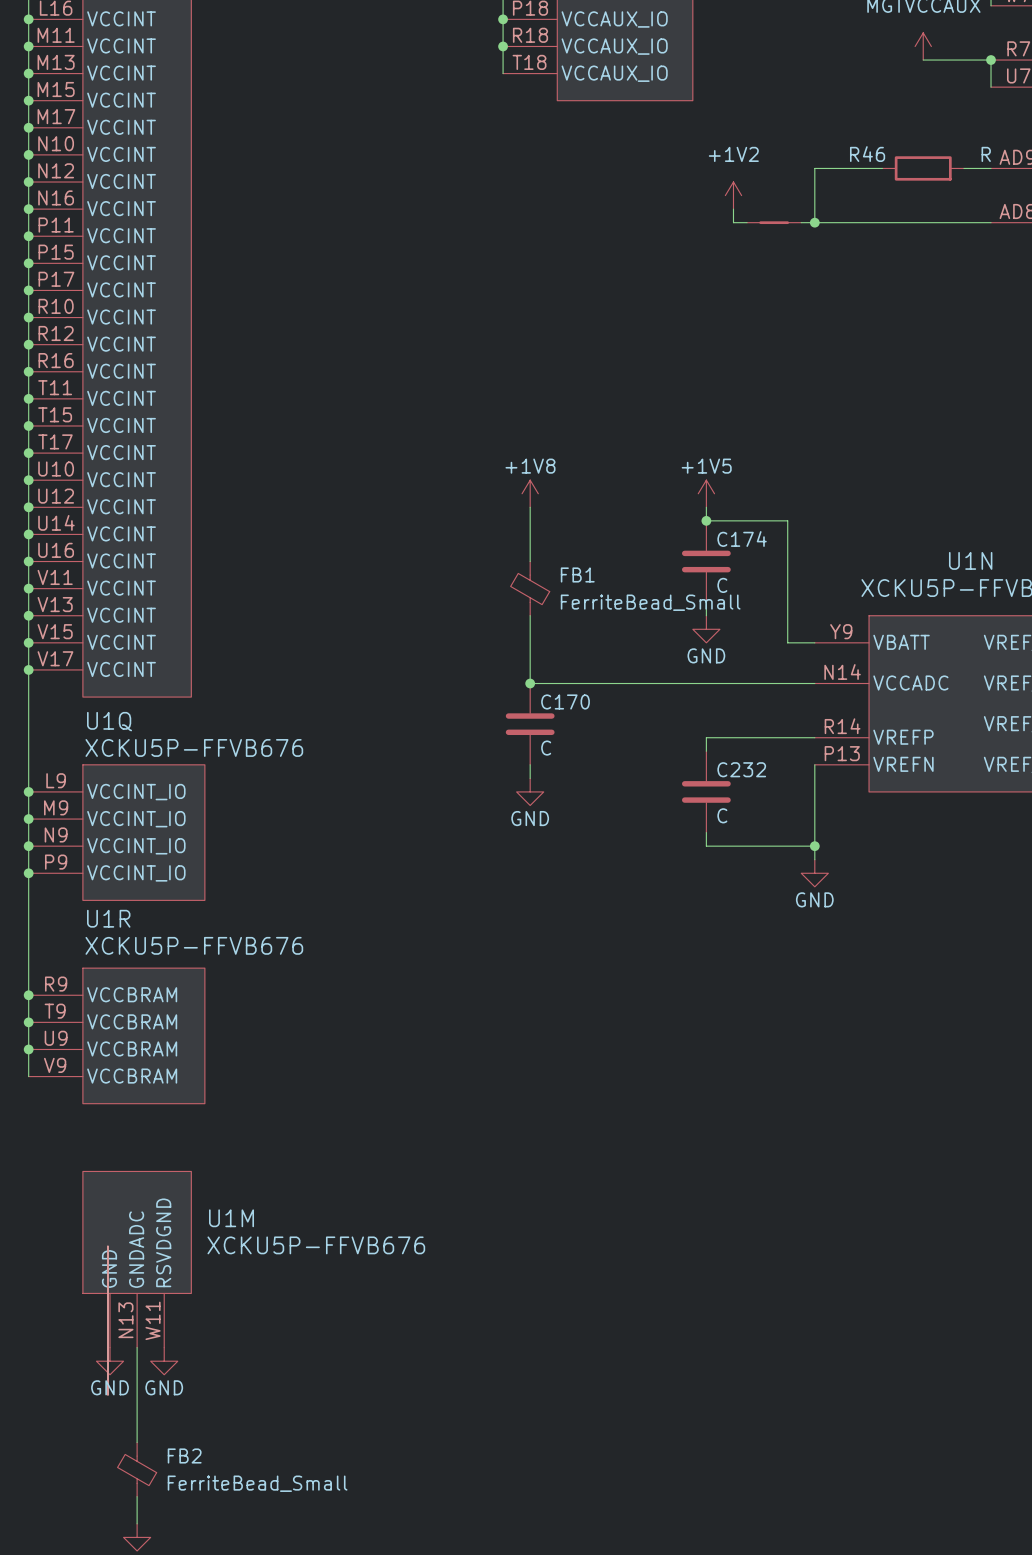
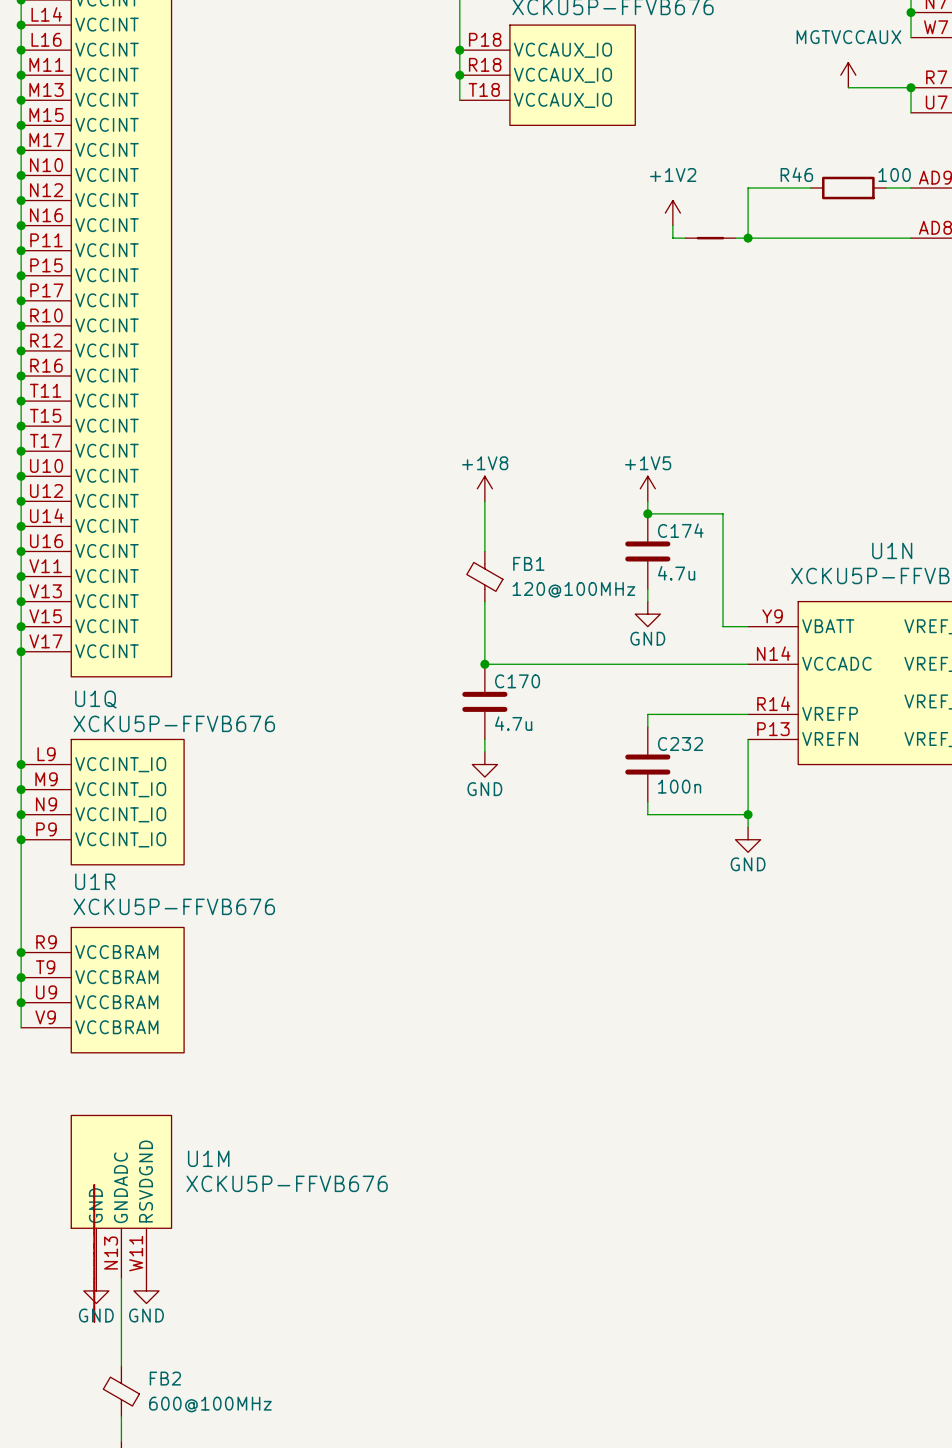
R46 value: R (986, 154) -> 100 (894, 175)
C174 value: C (722, 585) -> 4.7u (676, 573)
FB1 value: FerriteBead_Small (650, 602) -> 120@100MHz (573, 589)
C170 value: C (546, 748) -> 4.7u (513, 723)
C232 value: C (722, 815) -> 100n (679, 786)
FB2 value: FerriteBead_Small (257, 1483) -> 600@100MHz (210, 1404)

